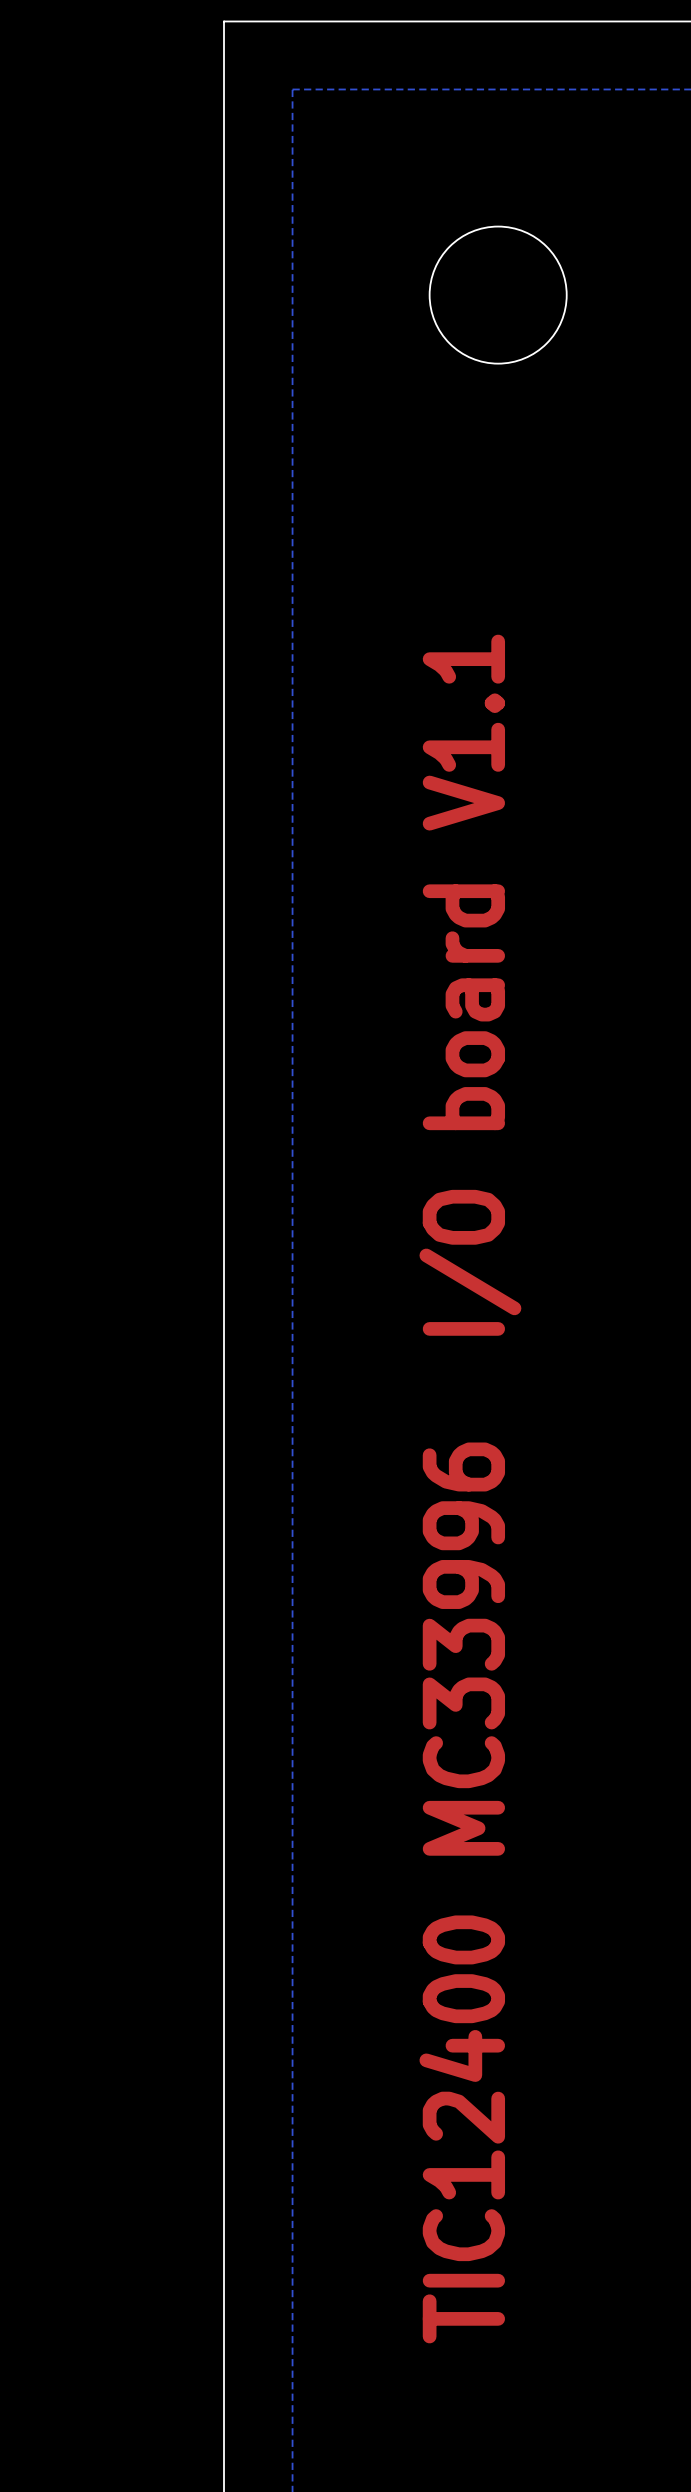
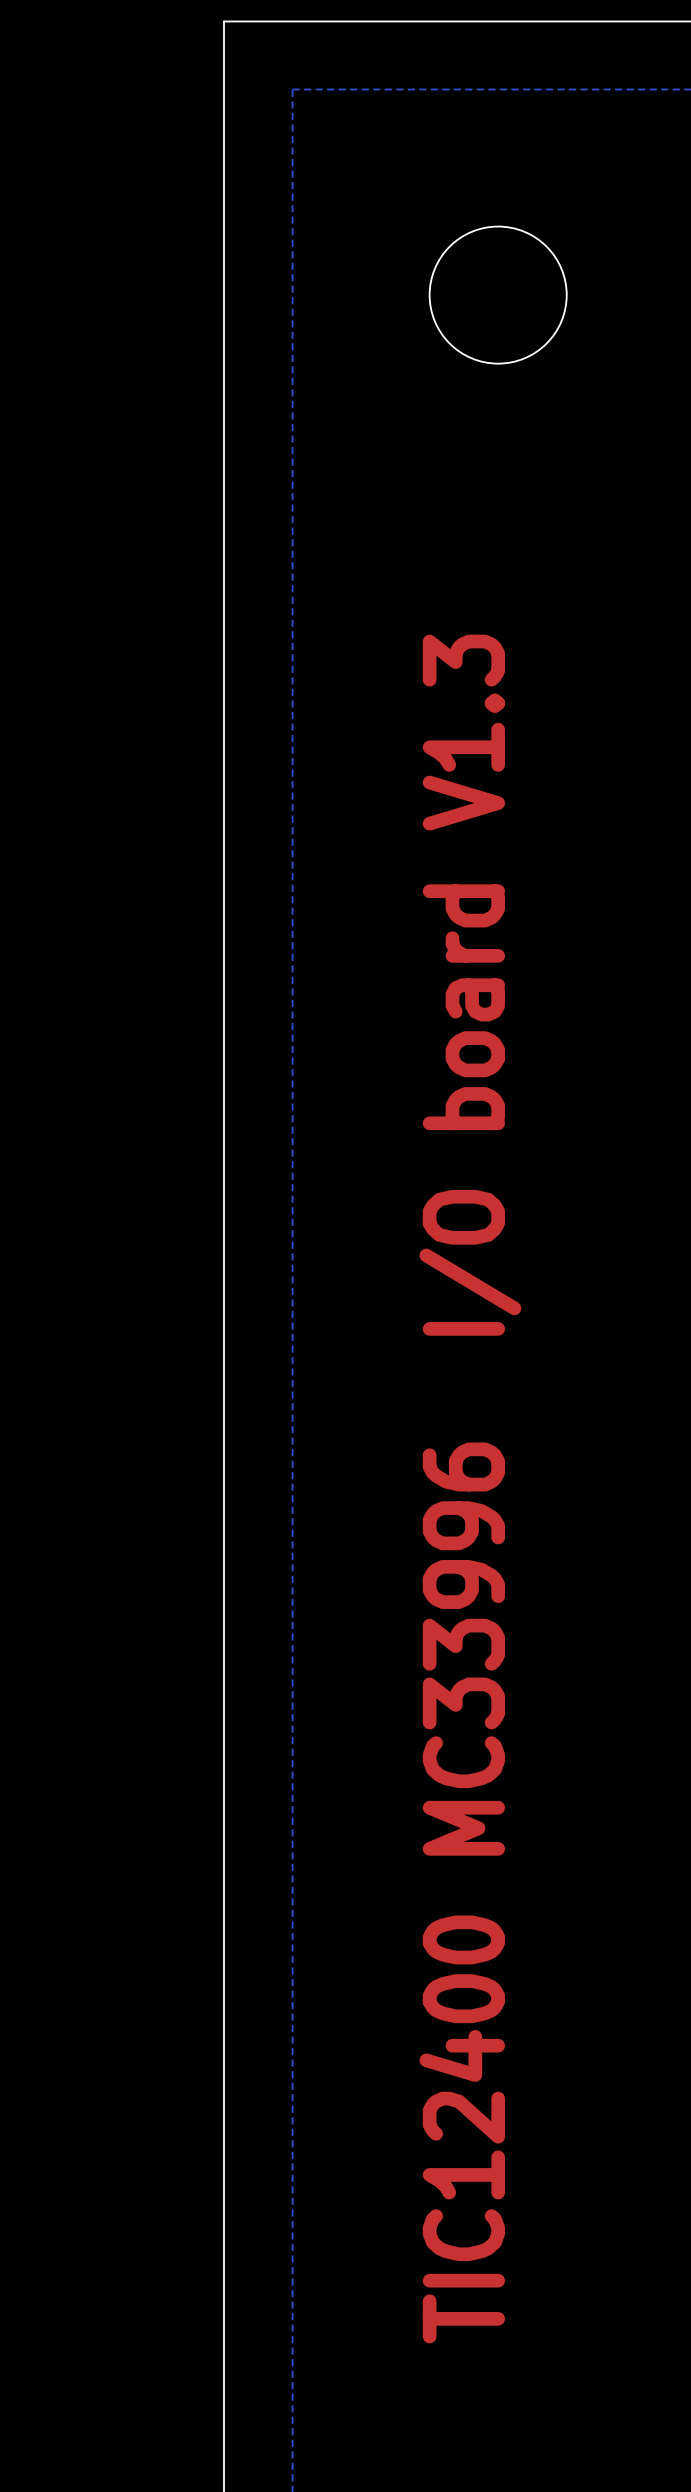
text: TIC12400 MC33996 I/O board V1.1 (470, 1489) -> TIC12400 MC33996 I/O board V1.3 (470, 1489)

